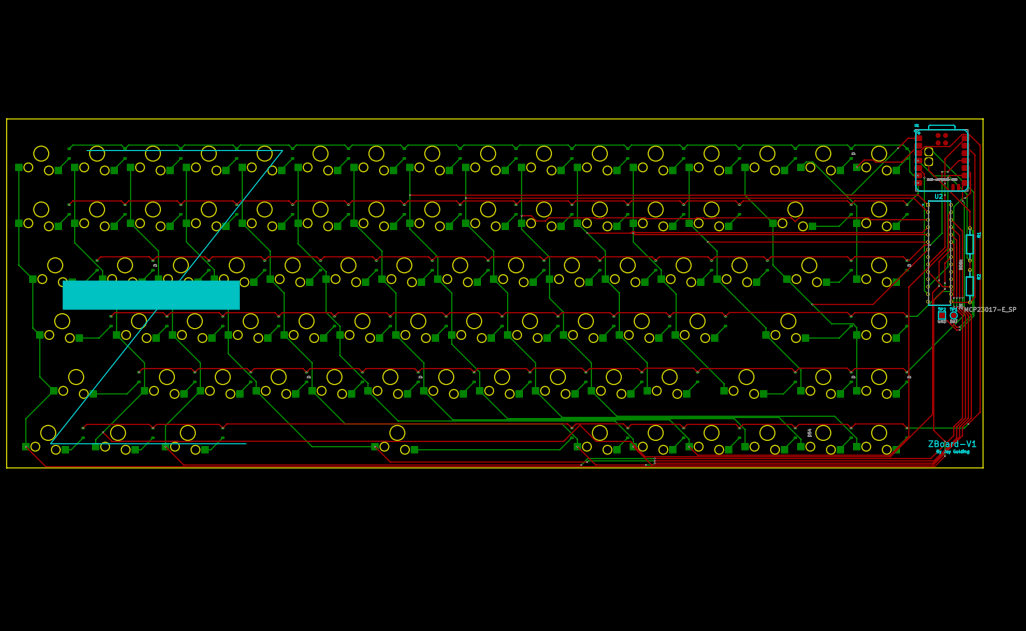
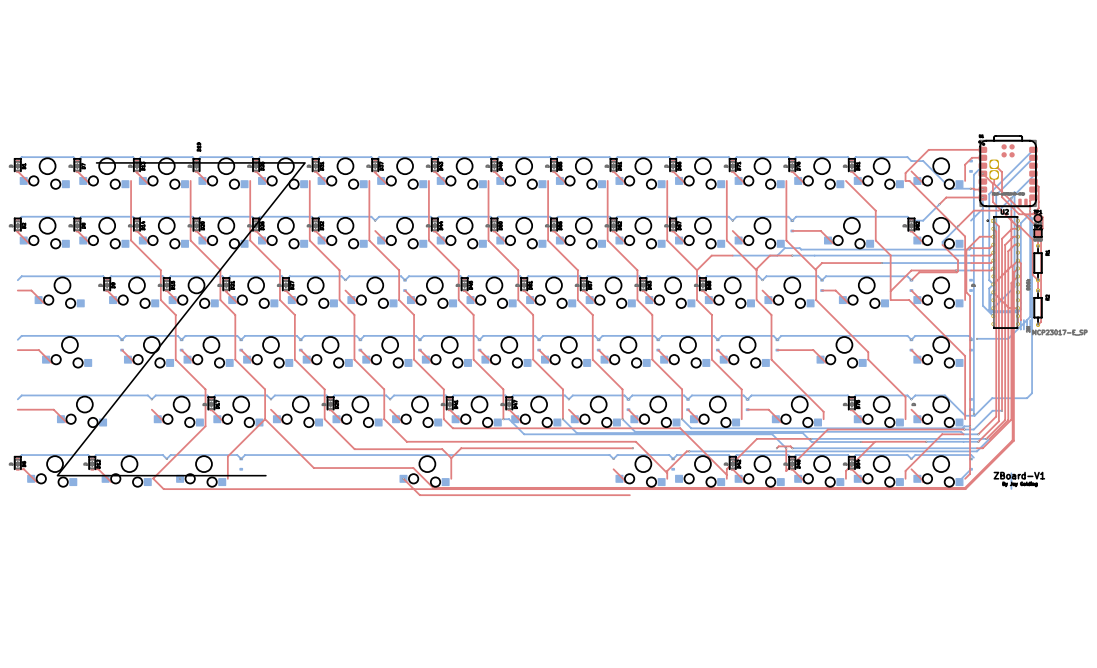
board edge: (6, 118) (983, 118) (983, 467) (6, 467) (6, 118) -> none
top track: (908, 138) (898, 148) -> (972, 149) (928, 149) (905, 173) (905, 180) (909, 180) (965, 236) (965, 300)
top track: (965, 138) (944, 158) (944, 183) -> none
top track: (918, 145) (901, 162) (864, 160) (856, 167) -> (982, 157) (972, 157) (965, 164) (965, 180)
bottom track: none -> (1033, 157) (996, 195) (996, 289) (990, 295) (990, 309) (992, 311) (1015, 311) (1017, 308)
top track: (965, 145) (974, 154) (974, 297) (972, 299) -> (994, 164) (1002, 172) (1002, 197) (1019, 214) (1039, 214) (1042, 217) (1042, 228) (1038, 233) (1041, 236) (1041, 321)
bottom track: none -> (17, 161) (21, 157) (73, 157) (77, 161)
bottom track: (851, 148) (854, 145) (903, 145) (909, 151) (909, 161) -> (911, 161) (923, 161) (950, 188) (970, 188)
bottom track: (898, 148) (851, 194) (845, 194) -> none
via: (898, 148) -> none
bottom track: (928, 151) (933, 151) (973, 192) (973, 315) (959, 330) -> none
part side: bottom (69, 153) -> top (17, 165)
part side: bottom (125, 153) -> top (77, 165)
part side: bottom (180, 153) -> top (136, 165)
part side: bottom (236, 153) -> top (196, 165)
part side: bottom (292, 153) -> top (256, 165)
part side: bottom (348, 153) -> top (315, 165)
part side: bottom (404, 153) -> top (375, 165)
part side: bottom (460, 153) -> top (434, 165)
part side: bottom (516, 153) -> top (494, 165)
part side: bottom (571, 153) -> top (553, 165)
part side: bottom (627, 153) -> top (613, 165)
part side: bottom (683, 153) -> top (673, 165)
part side: bottom (739, 153) -> top (732, 165)
part side: bottom (795, 153) -> top (792, 165)
part side: bottom (851, 153) -> top (851, 165)
bottom track: none -> (982, 165) (973, 174)
top track: (918, 153) (924, 146) (949, 146) (962, 134) (969, 134) (980, 145) (980, 412) (968, 423) -> none
top track: none -> (17, 171) (29, 184)
bottom track: (69, 158) (58, 170) -> none
top track: none -> (77, 171) (88, 184)
bottom track: (125, 158) (114, 170) -> none
top track: none -> (136, 171) (148, 184)
bottom track: (180, 158) (170, 170) -> none
top track: none -> (196, 171) (208, 184)
bottom track: (236, 158) (225, 170) -> none
top track: none -> (256, 171) (267, 184)
bottom track: (292, 158) (281, 170) -> none
top track: none -> (315, 171) (327, 184)
bottom track: (348, 158) (337, 170) -> none
top track: none -> (375, 171) (386, 184)
bottom track: (404, 158) (393, 170) -> none
top track: none -> (434, 171) (446, 184)
bottom track: (460, 158) (449, 170) -> none
top track: none -> (494, 171) (505, 184)
bottom track: (516, 158) (505, 170) -> none
top track: none -> (553, 171) (565, 184)
bottom track: (571, 158) (561, 170) -> none
top track: none -> (613, 171) (625, 184)
bottom track: (627, 158) (616, 170) -> none
top track: none -> (673, 171) (684, 184)
bottom track: (683, 158) (672, 170) -> none
top track: none -> (732, 171) (744, 184)
bottom track: (739, 158) (728, 170) -> none
top track: none -> (792, 171) (803, 184)
bottom track: (795, 158) (784, 170) -> none
top track: none -> (851, 171) (863, 184)
bottom track: (851, 158) (840, 170) -> none
top track: none -> (911, 171) (922, 184)
bottom track: (907, 158) (896, 170) -> none
bottom track: (918, 160) (933, 175) (948, 175) (967, 194) (967, 257) (969, 260) -> none
top track: none -> (982, 173) (992, 183) (992, 202) (1032, 239) (1032, 274) (1038, 280)
bottom track: none -> (1033, 173) (1033, 176) (998, 210)
top track: (965, 160) (959, 160) (947, 171) -> none
bottom track: (18, 167) (18, 265) (32, 279) (32, 327) (39, 334) (39, 376) (53, 390) (25, 418) (25, 446) -> none
bottom track: (74, 167) (74, 242) (102, 270) (102, 279) (116, 293) (116, 334) (144, 362) (144, 390) (95, 439) (95, 446) -> none
top track: none -> (131, 180) (131, 240) (160, 270) (160, 300) (175, 314) (175, 359) (205, 389) (205, 426) (153, 478) (163, 489) (965, 489) (1013, 440) (1013, 272)
bottom track: (130, 167) (130, 223) (158, 251) (158, 279) (172, 293) (172, 334) (200, 362) (200, 390) (165, 425) (165, 446) -> none
top track: none -> (190, 180) (190, 240) (220, 270) (220, 300) (235, 314) (235, 359) (265, 389) (265, 419)
bottom track: (186, 167) (186, 242) (214, 269) (214, 279) (228, 293) (228, 353) (256, 381) (256, 390) (312, 446) (374, 446) -> none
top track: none -> (250, 180) (250, 240) (279, 270) (279, 300) (294, 314) (294, 359) (324, 389) (324, 419) (354, 449) (442, 449) (451, 458)
bottom track: (242, 167) (242, 223) (270, 251) (270, 279) (284, 293) (284, 334) (312, 362) (312, 390) (345, 423) (562, 423) (577, 439) (577, 446) -> none
top track: none -> (309, 180) (309, 240) (339, 270) (339, 300) (354, 314) (354, 359) (384, 389) (384, 419) (406, 441) (635, 441) (667, 473)
bottom track: (298, 167) (298, 243) (326, 271) (326, 312) (340, 326) (340, 355) (367, 383) (367, 390) (398, 420) (614, 420) (633, 439) (633, 446) -> none
top track: none -> (369, 180) (369, 240) (399, 270) (399, 300) (414, 314) (414, 359) (443, 389) (443, 419) (452, 428) (680, 428) (726, 474)
bottom track: (354, 167) (354, 223) (381, 251) (381, 279) (395, 293) (395, 334) (423, 362) (423, 390) (452, 419) (669, 419) (689, 439) (689, 446) -> none
top track: none -> (428, 180) (428, 240) (458, 270) (458, 300) (473, 314) (473, 359) (503, 389) (503, 419)
bottom track: (409, 167) (409, 229) (437, 256) (437, 279) (451, 293) (451, 344) (479, 372) (479, 390) (507, 418) (734, 418) (745, 429) (745, 446) -> none
top track: none -> (488, 180) (488, 240) (518, 270) (518, 300) (533, 314) (533, 359) (562, 389) (562, 419)
bottom track: (465, 167) (465, 223) (493, 251) (493, 279) (507, 293) (507, 334) (535, 362) (535, 390) (562, 417) (779, 417) (800, 439) (800, 446) -> none
top track: none -> (548, 180) (548, 240) (577, 270) (577, 300) (592, 314) (592, 359) (622, 389) (622, 419)
bottom track: (521, 167) (521, 229) (549, 257) (549, 298) (563, 312) (563, 334) (591, 362) (591, 390) (616, 416) (834, 416) (856, 438) (856, 446) -> none
top track: none -> (607, 180) (607, 240) (637, 270) (637, 300) (652, 314) (652, 359) (682, 389) (682, 419)
bottom track: (577, 167) (577, 223) (605, 251) (605, 279) (619, 293) (619, 334) (647, 362) (647, 390) -> none
top track: none -> (667, 180) (667, 240) (697, 270)
bottom track: (633, 167) (633, 242) (661, 269) (661, 279) (676, 294) (675, 334) (724, 383) (724, 390) -> none
top track: none -> (726, 180) (726, 240) (756, 270)
bottom track: (689, 167) (689, 223) (717, 251) (717, 279) (765, 327) (765, 334) (800, 369) (800, 390) -> none
top track: none -> (786, 180) (786, 240) (816, 270)
bottom track: (745, 167) (745, 195) (772, 223) (772, 265) (831, 323) (852, 323) (856, 327) (856, 390) -> none
top track: none -> (845, 180) (875, 210) (875, 240) (890, 255) (890, 300) (909, 300) (965, 356) (965, 419)
bottom track: (800, 167) (806, 161) (812, 161) (856, 206) (856, 279) -> none
via: (856, 167) -> none
top track: (918, 168) (924, 174) (924, 177) -> none
bottom track: (909, 171) (913, 175) (918, 175) -> (973, 185) (973, 413)
bottom track: (942, 171) (947, 171) -> none
top track: (942, 171) (942, 180) -> none
via: (942, 171) -> none
via: (947, 171) -> none
top track: none -> (970, 188) (982, 189)
via: none -> (970, 188)
top track: (965, 175) (949, 175) (947, 177) -> none
bottom track: (924, 177) (924, 290) -> (982, 208) (982, 305) (989, 312)
via: (924, 177) -> none
via: (947, 177) -> none
bottom track: (942, 180) (942, 233) (930, 245) -> none
top track: none -> (982, 197) (946, 197) (939, 204)
bottom track: none -> (939, 204) (923, 220) (911, 220) (907, 216) (796, 216) (792, 220) (788, 216) (736, 216) (732, 220) (728, 216) (677, 216) (673, 220) (669, 216) (617, 216) (613, 220) (609, 216) (557, 216) (553, 220) (550, 216) (498, 216) (494, 220) (490, 216) (438, 216) (434, 220) (430, 216) (379, 216) (375, 220) (371, 216) (319, 216) (315, 220) (311, 216) (260, 216) (256, 220) (252, 216) (200, 216) (196, 220) (192, 216) (140, 216) (136, 220) (133, 216) (81, 216) (77, 220) (73, 216) (21, 216) (17, 220)
via: none -> (939, 204)
top track: (409, 195) (918, 195) (928, 204) -> (978, 441) (998, 421) (998, 226) (993, 220)
via: (409, 195) -> none
top track: none -> (998, 210) (973, 210) (958, 226)
via: (944, 195) -> none
bottom track: none -> (1030, 210) (1030, 316) (1008, 338) (977, 338)
via: none -> (1030, 210)
top track: (465, 198) (913, 198) (928, 212) -> (978, 434) (996, 416) (996, 231) (993, 228)
via: (465, 198) -> none
via: (965, 198) -> none
via: (962, 200) -> none
top track: (516, 204) (513, 200) (463, 200) (460, 204) (456, 200) (408, 200) (404, 204) (400, 200) (352, 200) (348, 204) (344, 200) (296, 200) (292, 204) (288, 200) (240, 200) (236, 204) (233, 200) (184, 200) (180, 204) (177, 200) (128, 200) (125, 204) (121, 200) (72, 200) (69, 204) -> none
top track: (516, 204) (519, 200) (568, 200) (571, 204) (575, 200) (624, 200) (627, 204) (631, 200) (679, 200) (683, 204) (687, 200) (735, 200) (739, 204) (743, 200) (847, 200) (851, 204) (854, 200) (903, 200) (907, 204) -> none
via: (907, 204) -> none
part side: bottom (69, 209) -> top (17, 225)
part side: bottom (125, 209) -> top (77, 225)
part side: bottom (180, 209) -> top (136, 225)
part side: bottom (236, 209) -> top (196, 225)
part side: bottom (292, 209) -> top (256, 225)
part side: bottom (348, 209) -> top (315, 225)
part side: bottom (460, 209) -> top (434, 225)
part side: bottom (516, 209) -> top (494, 225)
part side: bottom (571, 209) -> top (553, 225)
part side: bottom (627, 209) -> top (613, 225)
part side: bottom (683, 209) -> top (673, 225)
bottom track: none -> (958, 226) (942, 241) (942, 244)
via: none -> (958, 226)
part side: bottom (907, 209) -> top (911, 225)
top track: (951, 212) (948, 214) (948, 247) (908, 287) (908, 436) (890, 455) -> (1017, 260) (1012, 265) (1012, 440) (965, 487) (953, 487)
top track: none -> (1017, 228) (1011, 228) (1002, 238) (1002, 410)
top track: none -> (17, 230) (29, 243)
bottom track: (69, 214) (58, 226) -> none
top track: none -> (77, 230) (88, 243)
bottom track: (125, 214) (114, 226) -> none
top track: none -> (136, 230) (148, 243)
bottom track: (180, 214) (170, 226) -> none
top track: none -> (196, 230) (208, 243)
bottom track: (236, 214) (225, 226) -> none
top track: none -> (256, 230) (267, 243)
bottom track: (292, 214) (281, 226) -> none
top track: none -> (315, 230) (327, 243)
bottom track: (348, 214) (337, 226) -> none
top track: none -> (375, 230) (386, 243)
bottom track: (404, 214) (393, 226) -> none
top track: none -> (434, 230) (446, 243)
bottom track: (460, 214) (449, 226) -> none
top track: none -> (494, 230) (505, 243)
bottom track: (516, 214) (505, 226) -> none
top track: none -> (553, 230) (565, 243)
bottom track: (571, 214) (561, 226) -> none
top track: none -> (613, 230) (625, 243)
bottom track: (627, 214) (616, 226) -> none
top track: none -> (673, 230) (684, 243)
bottom track: (683, 214) (672, 226) -> none
top track: none -> (732, 230) (744, 243)
bottom track: (739, 214) (728, 226) -> none
top track: none -> (792, 230) (820, 230) (833, 243)
bottom track: (851, 214) (839, 226) (812, 226) -> none
top track: none -> (911, 230) (922, 243)
bottom track: (907, 214) (896, 226) -> none
top track: (521, 215) (531, 215) (536, 221) (545, 221) (548, 217) (791, 217) (795, 221) (799, 217) (915, 219) -> (965, 478) (970, 473) (970, 296) (966, 292) (966, 250) (979, 236)
via: (521, 215) -> none
top track: (951, 219) (962, 231) (962, 297) -> none
top track: (951, 227) (959, 235) (959, 297) -> (1017, 244) (1014, 244) (1008, 251) (1008, 420) (989, 438)
bottom track: (969, 228) (972, 231) (972, 314) (959, 327) -> none
bottom track: none -> (971, 248) (784, 248) (777, 255) (732, 255)
via: none -> (971, 248)
top track: (924, 230) (922, 232) (632, 231) (630, 233) (587, 233) -> (989, 248) (971, 248)
via: (587, 233) -> none
top track: (633, 233) (928, 234) -> (971, 255) (990, 255) (993, 252)
via: (633, 233) -> none
top track: (951, 234) (956, 240) (956, 297) -> none
top track: none -> (732, 255) (711, 255) (697, 270)
bottom track: none -> (792, 255) (971, 255)
top track: none -> (792, 255) (769, 255) (756, 268) (756, 300) (771, 314) (771, 359) (823, 411) (823, 419)
via: none -> (792, 255)
via: (707, 241) -> none
top track: (707, 242) (928, 242) -> (971, 263) (990, 263) (993, 260)
bottom track: none -> (881, 263) (971, 263)
top track: none -> (881, 263) (822, 263) (816, 268) (816, 300) (868, 352) (868, 359) (905, 396) (905, 419)
via: none -> (881, 263)
top track: (930, 245) (924, 245) (908, 260) (903, 256) (854, 256) -> (942, 244) (958, 260) (958, 271) (919, 272) (915, 276)
via: (930, 245) -> none
top track: none -> (697, 270) (697, 300) (711, 314) (711, 359) (741, 389) (741, 419)
bottom track: none -> (956, 270) (971, 270)
top track: none -> (956, 270) (911, 270) (890, 291)
via: none -> (956, 270)
top track: (926, 251) (873, 304) (812, 304) -> (991, 270) (971, 270)
top track: (947, 253) (939, 261) -> (1017, 236) (1013, 236) (1005, 244) (1005, 281)
bottom track: none -> (17, 280) (21, 276) (103, 276) (107, 280) (111, 276) (162, 276) (166, 280) (170, 276) (222, 276) (226, 280) (230, 276) (281, 276) (285, 280) (289, 276) (341, 276) (345, 280) (349, 276) (401, 276) (405, 280) (408, 276) (460, 276) (464, 280) (468, 276) (520, 276) (524, 280) (528, 276) (579, 276) (583, 280) (587, 276) (639, 276) (643, 280) (647, 276) (699, 276) (702, 280) (706, 276) (758, 276) (762, 280) (766, 276) (818, 276) (822, 280) (825, 276) (907, 276) (911, 280)
top track: (97, 260) (100, 256) (149, 256) (152, 260) (156, 256) (205, 256) (208, 260) (212, 256) (260, 256) (264, 260) (268, 256) (316, 256) (320, 260) (324, 256) (372, 256) (376, 260) (380, 256) (428, 256) (432, 260) (435, 256) (484, 256) (488, 260) (491, 256) (540, 256) (543, 260) (547, 256) (596, 256) (599, 260) (603, 256) (652, 256) (655, 260) (659, 256) (707, 256) (711, 260) (715, 256) (763, 256) (767, 260) (771, 256) (847, 256) (851, 260) -> none
via: (907, 260) -> none
part side: bottom (152, 265) -> top (107, 284)
part side: bottom (208, 265) -> top (166, 284)
part side: bottom (264, 265) -> top (226, 284)
part side: bottom (320, 265) -> top (285, 284)
part side: bottom (488, 265) -> top (464, 284)
part side: bottom (543, 265) -> top (524, 284)
part side: bottom (599, 265) -> top (583, 284)
part side: bottom (655, 265) -> top (643, 284)
part side: bottom (711, 265) -> top (702, 284)
top track: none -> (17, 290) (31, 290) (44, 303)
bottom track: (97, 270) (85, 282) (72, 282) -> none
top track: none -> (107, 290) (118, 303)
bottom track: (152, 270) (142, 282) -> none
top track: none -> (166, 290) (178, 303)
bottom track: (208, 270) (198, 282) -> none
top track: none -> (226, 290) (237, 303)
bottom track: (264, 270) (253, 282) -> none
top track: none -> (285, 290) (297, 303)
bottom track: (320, 270) (309, 282) -> none
top track: none -> (345, 290) (357, 303)
bottom track: (376, 270) (365, 282) -> none
top track: none -> (405, 290) (416, 303)
bottom track: (432, 270) (421, 282) -> none
top track: none -> (464, 290) (476, 303)
bottom track: (488, 270) (477, 282) -> none
top track: none -> (524, 290) (535, 303)
bottom track: (543, 270) (533, 282) -> none
top track: none -> (583, 290) (595, 303)
bottom track: (599, 270) (589, 282) -> none
top track: none -> (643, 290) (654, 303)
bottom track: (655, 270) (644, 282) -> none
top track: none -> (702, 290) (714, 303)
bottom track: (711, 270) (700, 282) -> none
top track: none -> (762, 290) (774, 303)
bottom track: (767, 270) (756, 282) -> none
top track: none -> (822, 290) (835, 290) (848, 303)
bottom track: (851, 270) (839, 282) (826, 282) -> none
top track: none -> (911, 290) (922, 303)
drawing: [62, 280, 240, 310] -> none
top track: none -> (1005, 301) (1005, 420) (986, 438)
via: (939, 280) -> none
bottom track: (944, 283) (944, 289) -> none
top track: none -> (1011, 304) (1011, 419) (982, 448) (977, 448)
via: (944, 283) -> none
top track: (939, 286) (932, 292) (932, 414) (890, 456) (645, 456) (630, 441) (596, 441) (579, 425) (563, 441) (112, 441) (103, 432) -> none
via: (939, 286) -> none
bottom track: (953, 287) (951, 291) (941, 291) (917, 316) (907, 316) -> (1020, 309) (1017, 312) (991, 312) (989, 309) (989, 288) (993, 284) (989, 280) (989, 194) (1033, 149)
top track: (944, 289) (933, 300) (933, 430) (944, 441) -> none
via: (944, 289) -> none
via: (953, 297) -> none
via: (956, 297) -> none
via: (959, 297) -> none
via: (962, 297) -> none
top track: (951, 301) (969, 302) -> none
via: (812, 304) -> none
top track: (953, 306) (962, 315) (962, 418) (953, 426) (953, 435) (930, 458) (654, 458) -> none
via: (953, 306) -> none
top track: (956, 306) (965, 315) (965, 418) (956, 426) (956, 438) (933, 460) (654, 460) -> none
via: (956, 306) -> none
top track: (959, 306) (968, 315) (968, 418) (959, 426) (959, 436) (933, 463) (654, 463) -> none
top track: (962, 306) (971, 315) (971, 418) (962, 426) (962, 435) (933, 464) (651, 464) (633, 446) -> none
bottom track: (964, 314) (907, 372) -> (1032, 338) (1032, 393) (1027, 398) (992, 398) (974, 415) (965, 415) (944, 395) (915, 395) (911, 399) (907, 395) (855, 395) (851, 399) (847, 395) (751, 395) (747, 399) (743, 395) (691, 395) (688, 399) (684, 395) (632, 395) (628, 399) (624, 395) (572, 395) (568, 399) (564, 395) (513, 395) (509, 399) (505, 395) (453, 395) (449, 399) (445, 395) (394, 395) (390, 399) (386, 395) (334, 395) (330, 399) (326, 395) (274, 395) (271, 399) (267, 395) (215, 395) (211, 399) (207, 395) (155, 395) (151, 399) (147, 395) (21, 395) (17, 399)
bottom track: none -> (971, 338) (968, 335) (915, 335) (911, 339) (907, 335) (781, 335) (777, 339) (773, 335) (721, 335) (717, 339) (713, 335) (662, 335) (658, 339) (654, 335) (602, 335) (598, 339) (594, 335) (543, 335) (539, 339) (535, 335) (483, 335) (479, 339) (475, 335) (423, 335) (419, 339) (416, 335) (364, 335) (360, 339) (356, 335) (304, 335) (300, 339) (296, 335) (245, 335) (241, 339) (237, 335) (185, 335) (181, 339) (177, 335) (125, 335) (122, 339) (118, 335) (21, 335) (17, 339)
via: none -> (977, 338)
top track: (942, 315) (956, 330) (959, 330) -> none
part position: (942, 315) -> (1038, 233)
top track: (953, 315) (953, 324) (959, 327) -> none
part position: (953, 315) -> (1038, 218)
top track: (111, 316) (114, 312) (163, 312) (166, 316) (170, 312) (219, 312) (222, 316) (226, 312) (274, 312) (278, 316) (282, 312) (330, 312) (334, 316) (338, 312) (386, 312) (390, 316) (394, 312) (442, 312) (446, 316) (449, 312) (498, 312) (502, 316) (505, 312) (554, 312) (557, 316) (561, 312) (610, 312) (613, 316) (617, 312) (665, 312) (669, 316) (673, 312) (721, 312) (725, 316) (729, 312) (847, 312) (851, 316) (854, 312) (903, 312) (907, 316) -> none
top track: none -> (17, 350) (38, 350) (51, 362)
bottom track: (111, 326) (99, 338) (79, 338) -> none
top track: none -> (122, 350) (133, 362)
bottom track: (166, 326) (156, 338) -> none
top track: none -> (181, 350) (193, 362)
bottom track: (222, 326) (211, 338) -> none
top track: none -> (241, 350) (252, 362)
bottom track: (278, 326) (267, 338) -> none
top track: none -> (300, 350) (312, 362)
bottom track: (334, 326) (323, 338) -> none
top track: none -> (360, 350) (371, 362)
bottom track: (390, 326) (379, 338) -> none
top track: none -> (419, 350) (431, 362)
bottom track: (446, 326) (435, 338) -> none
top track: none -> (479, 350) (491, 362)
bottom track: (502, 326) (491, 338) -> none
top track: none -> (539, 350) (550, 362)
bottom track: (557, 326) (547, 338) -> none
top track: none -> (598, 350) (610, 362)
bottom track: (613, 326) (602, 338) -> none
top track: none -> (658, 350) (669, 362)
bottom track: (669, 326) (658, 338) -> none
top track: none -> (717, 350) (729, 362)
bottom track: (725, 326) (714, 338) -> none
top track: none -> (777, 350) (813, 350) (826, 362)
bottom track: (851, 326) (839, 338) (805, 338) -> none
top track: none -> (911, 350) (922, 362)
bottom track: (907, 326) (896, 338) -> none
via: (959, 327) -> none
via: (959, 330) -> none
top track: (138, 372) (142, 368) (191, 368) (194, 372) (198, 368) (247, 368) (250, 372) (254, 368) (302, 368) (306, 372) (310, 368) (358, 368) (362, 372) (366, 368) (414, 368) (418, 372) (421, 368) (470, 368) (474, 372) (477, 368) (526, 368) (530, 372) (534, 368) (581, 368) (585, 372) (589, 368) (638, 368) (641, 372) (645, 368) (693, 368) (697, 372) (701, 368) (791, 368) (795, 372) (799, 368) (847, 368) (851, 372) (854, 368) (903, 368) (907, 372) -> none
via: (907, 372) -> none
part: (138, 377) -> none
part side: bottom (250, 377) -> top (211, 404)
part side: bottom (362, 377) -> top (330, 404)
part side: bottom (474, 377) -> top (449, 404)
part side: bottom (530, 377) -> top (509, 404)
part side: bottom (851, 377) -> top (851, 404)
top track: none -> (17, 409) (53, 409) (66, 422)
bottom track: (138, 381) (126, 393) (93, 393) -> none
top track: none -> (151, 409) (163, 422)
bottom track: (194, 381) (184, 393) -> none
top track: none -> (211, 409) (222, 422)
bottom track: (250, 381) (239, 393) -> none
top track: none -> (271, 409) (282, 422)
bottom track: (306, 381) (295, 393) -> none
top track: none -> (330, 409) (342, 422)
bottom track: (362, 381) (351, 393) -> none
top track: none -> (390, 409) (401, 422)
bottom track: (418, 381) (407, 393) -> none
top track: none -> (449, 409) (461, 422)
bottom track: (474, 381) (463, 393) -> none
top track: none -> (509, 409) (520, 422)
bottom track: (530, 381) (519, 393) -> none
top track: none -> (568, 409) (580, 422)
bottom track: (585, 381) (575, 393) -> none
top track: none -> (628, 409) (639, 422)
bottom track: (641, 381) (630, 393) -> none
top track: none -> (688, 409) (699, 422)
bottom track: (697, 381) (686, 393) -> none
top track: none -> (747, 409) (768, 409) (781, 422)
bottom track: (795, 381) (783, 393) (763, 393) -> none
top track: none -> (851, 409) (863, 422)
bottom track: (851, 381) (840, 393) -> none
top track: none -> (911, 409) (922, 422)
bottom track: (907, 381) (896, 393) -> none
bottom track: none -> (1002, 410) (992, 410) (973, 429) (964, 429)
via: none -> (1002, 410)
via: none -> (973, 413)
top track: none -> (265, 419) (227, 456) (227, 478)
bottom track: none -> (503, 419) (509, 419) (524, 434) (772, 434) (786, 448)
via: none -> (503, 419)
bottom track: none -> (562, 419) (576, 433) (802, 433) (811, 442) (861, 442)
via: none -> (562, 419)
bottom track: none -> (622, 419) (635, 431) (961, 431) (963, 434) (978, 434)
via: none -> (622, 419)
bottom track: none -> (682, 419) (691, 428) (962, 428) (970, 426)
via: none -> (682, 419)
via: none -> (970, 426)
top track: none -> (964, 429) (827, 429) (786, 470) (786, 448)
via: none -> (964, 429)
top track: none -> (963, 434) (942, 434) (905, 470) (905, 478)
via: none -> (978, 434)
bottom track: none -> (811, 438) (986, 438)
top track: none -> (811, 438) (756, 438) (726, 469) (726, 478)
via: none -> (811, 438)
via: none -> (986, 438)
bottom track: none -> (989, 438) (977, 451) (689, 451)
bottom track: none -> (926, 441) (978, 441)
top track: none -> (926, 441) (875, 441) (845, 470) (845, 478)
via: none -> (926, 441)
via: none -> (978, 441)
top track: none -> (861, 442) (874, 442)
via: none -> (861, 442)
top track: none -> (632, 448) (461, 448) (451, 458)
via: none -> (632, 448)
top track: none -> (776, 448) (778, 446) (790, 446) (792, 448)
via: none -> (776, 448)
via: none -> (786, 448)
bottom track: none -> (792, 448) (977, 448)
via: none -> (792, 448)
top track: none -> (689, 451) (686, 451) (667, 470) (667, 478)
via: none -> (689, 451)
bottom track: (968, 423) (964, 428) (907, 428) -> none
via: (968, 423) -> none
bottom track: none -> (973, 457) (971, 455) (915, 455) (911, 458) (907, 455) (855, 455) (851, 458) (847, 455) (796, 455) (792, 458) (788, 455) (736, 455) (732, 458) (728, 455) (677, 455) (673, 458) (669, 455) (617, 455) (613, 458) (609, 455) (245, 455) (241, 458) (237, 455) (170, 455) (166, 458) (162, 455) (96, 455) (92, 458) (88, 455) (21, 455) (17, 458)
top track: none -> (451, 458) (451, 478)
top track: (83, 428) (86, 424) (149, 424) (152, 428) (156, 424) (219, 424) (222, 428) (226, 423) (567, 423) (571, 428) (576, 423) (623, 423) (627, 428) (631, 424) (679, 424) (683, 428) (687, 424) (735, 424) (739, 428) (743, 424) (791, 424) (795, 428) (799, 424) (847, 424) (851, 428) (855, 423) (902, 423) (907, 428) -> none
part side: bottom (83, 432) -> top (17, 463)
via: (103, 432) -> none
part side: bottom (152, 432) -> top (92, 463)
part: (571, 432) -> none
part side: bottom (739, 432) -> top (732, 463)
part side: bottom (795, 432) -> top (792, 463)
part side: bottom (851, 432) -> top (851, 463)
top track: none -> (17, 469) (23, 469) (36, 482)
bottom track: (83, 437) (71, 449) (65, 449) -> none
top track: none -> (92, 469) (98, 469) (111, 482)
bottom track: (152, 437) (140, 449) (135, 449) -> none
bottom track: (222, 437) (210, 449) (204, 449) -> none
bottom track: (571, 437) (559, 449) (414, 449) -> none
top track: none -> (613, 469) (625, 482)
bottom track: (627, 437) (616, 449) -> none
bottom track: (683, 437) (672, 449) -> none
top track: none -> (732, 469) (744, 482)
bottom track: (739, 437) (728, 449) -> none
top track: none -> (792, 469) (803, 482)
bottom track: (795, 437) (784, 449) -> none
top track: none -> (851, 469) (863, 482)
bottom track: (851, 437) (840, 449) -> none
top track: none -> (911, 469) (922, 482)
via: (944, 441) -> none
top track: (25, 446) (45, 466) (934, 466) (944, 456) -> none
via: (25, 446) -> none
top track: (165, 446) (183, 464) (581, 464) -> none
top track: (577, 446) (595, 464) (645, 464) -> none
via: (577, 446) -> none
via: (633, 446) -> none
top track: (689, 446) (697, 455) -> (265, 419) (313, 468) (413, 468) (433, 487) (747, 487)
via: (689, 446) -> none
via: (944, 456) -> none
bottom track: (654, 458) (587, 458) (581, 464) -> none
via: (654, 458) -> none
bottom track: (654, 460) (587, 462) -> none
via: (654, 460) -> none
via: (587, 462) -> none
bottom track: (654, 463) (645, 464) -> none
via: (654, 463) -> none
via: (581, 464) -> none
via: (645, 464) -> none

